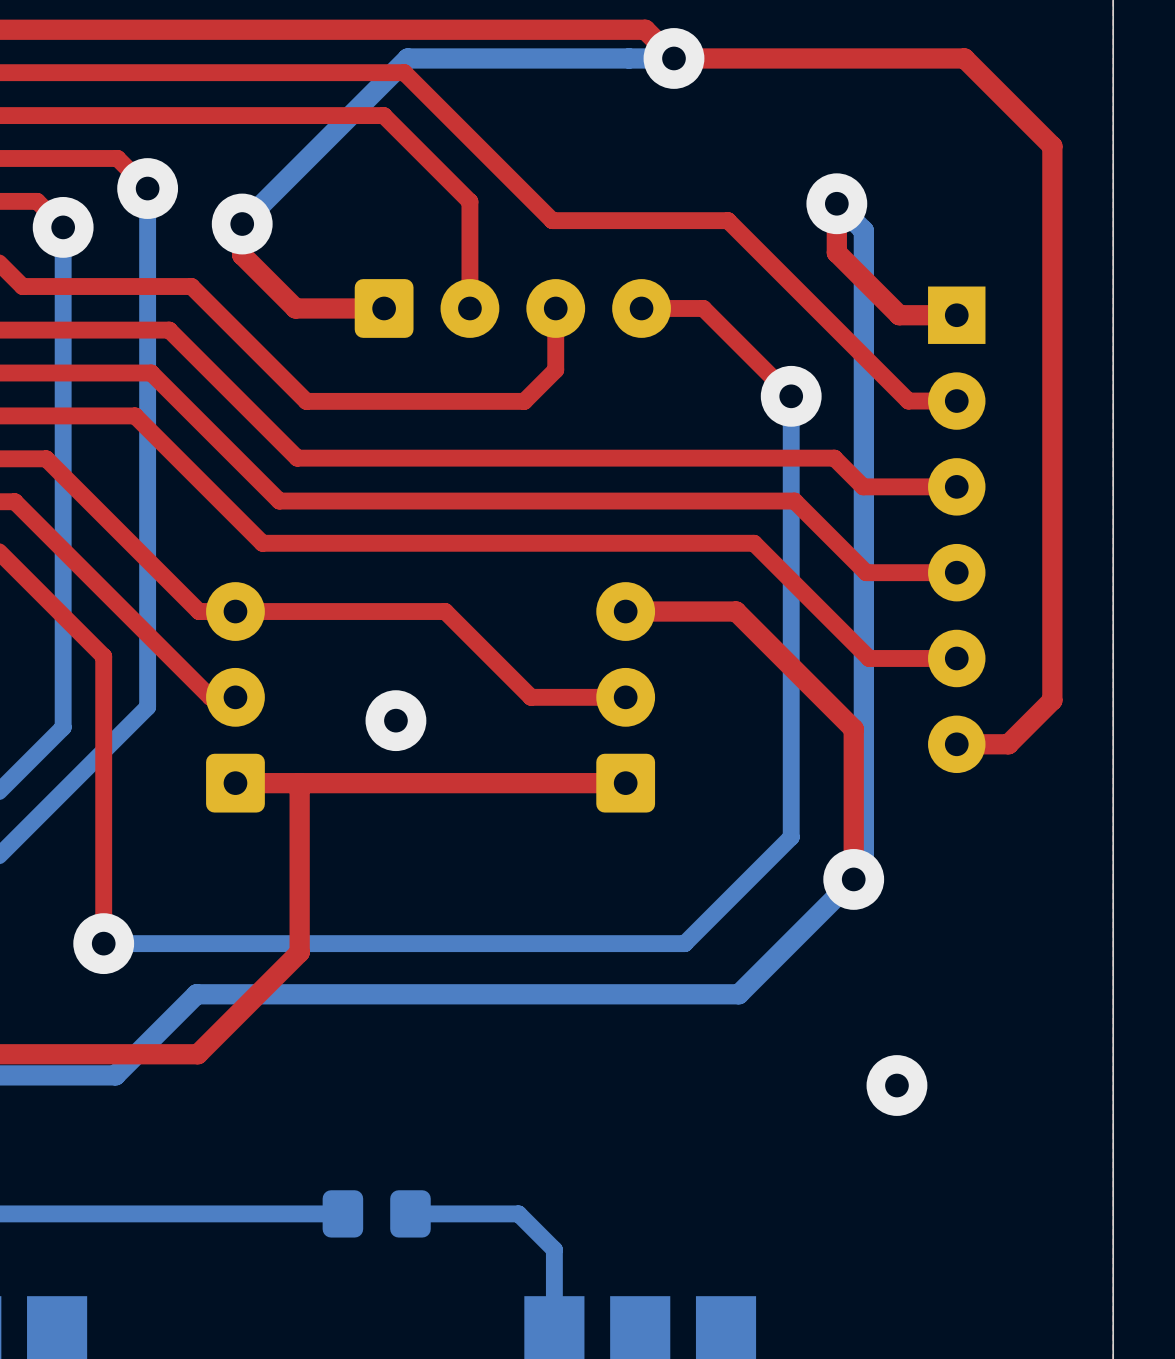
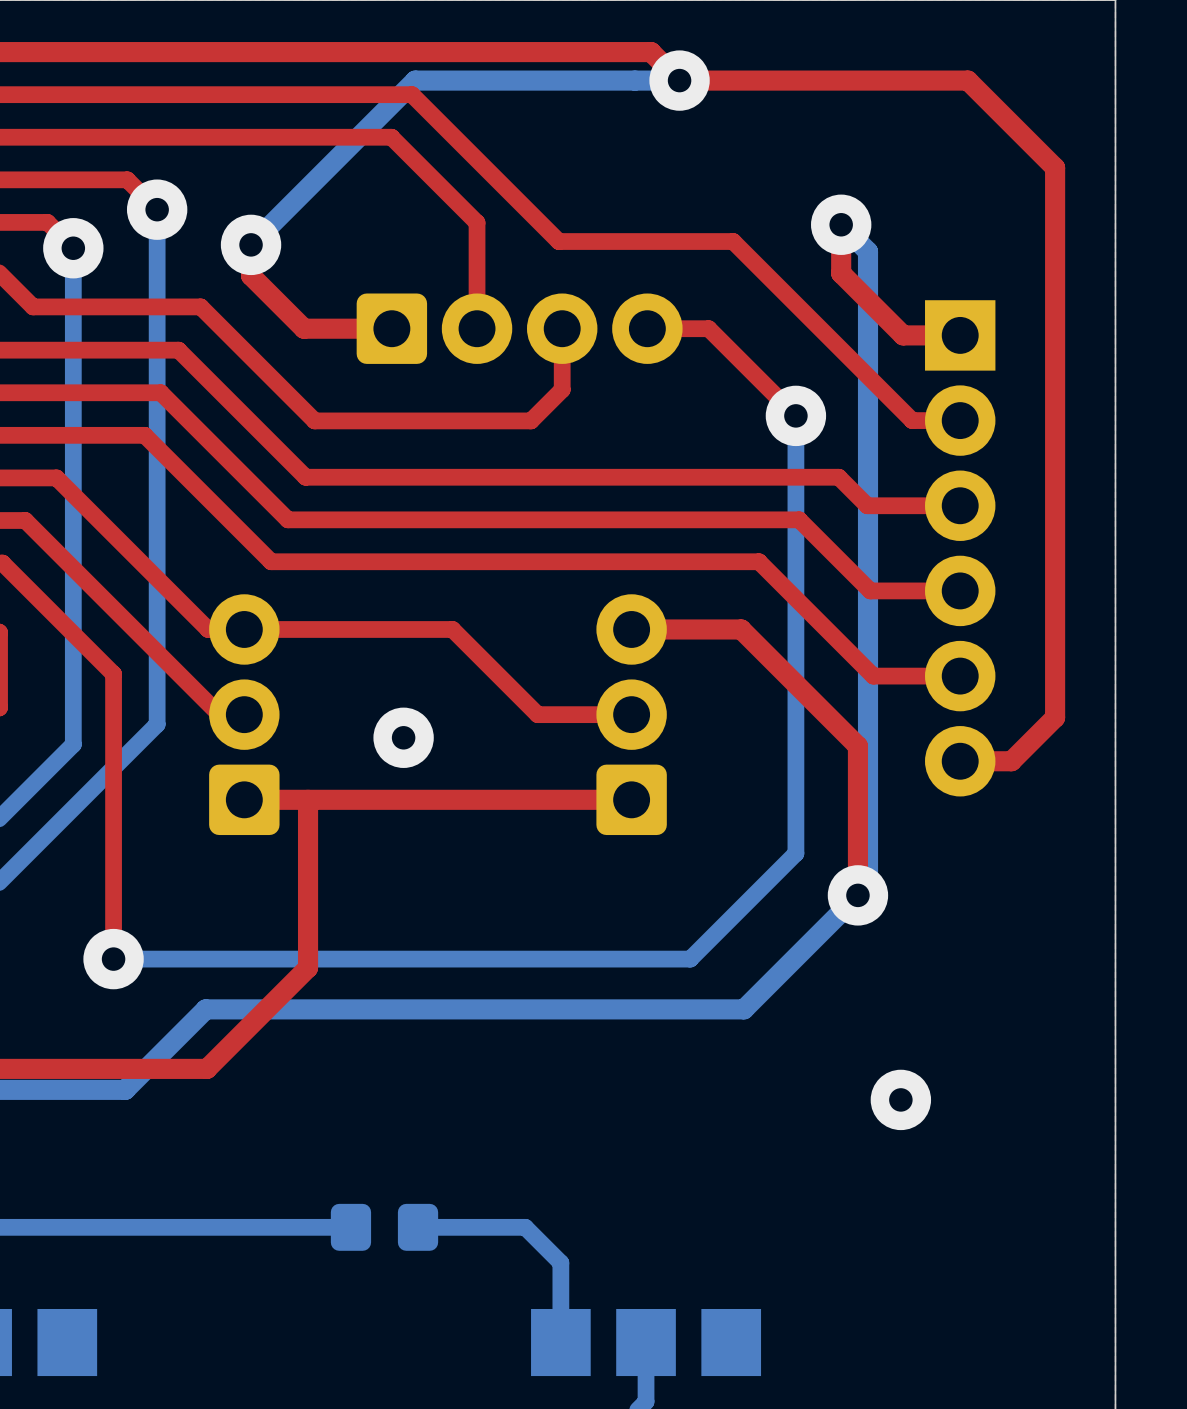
part footprint: [354, 279, 671, 338] -> [356, 293, 683, 364]
part footprint: [928, 286, 986, 774] -> [925, 300, 996, 797]
part footprint: [206, 582, 265, 813] -> [209, 594, 280, 836]
part footprint: [596, 582, 656, 813] -> [596, 594, 667, 836]

